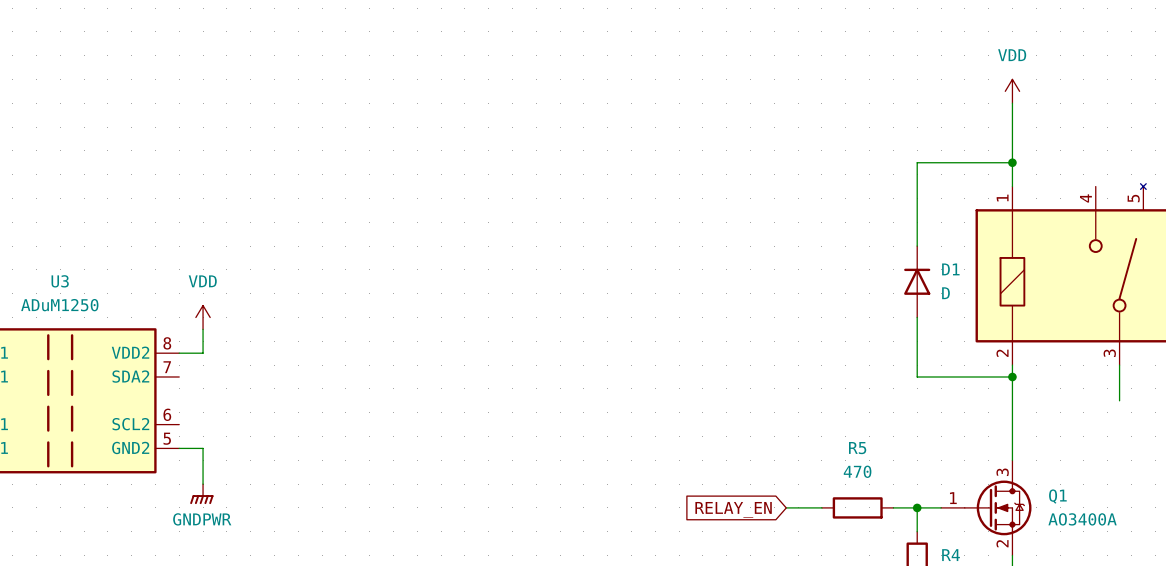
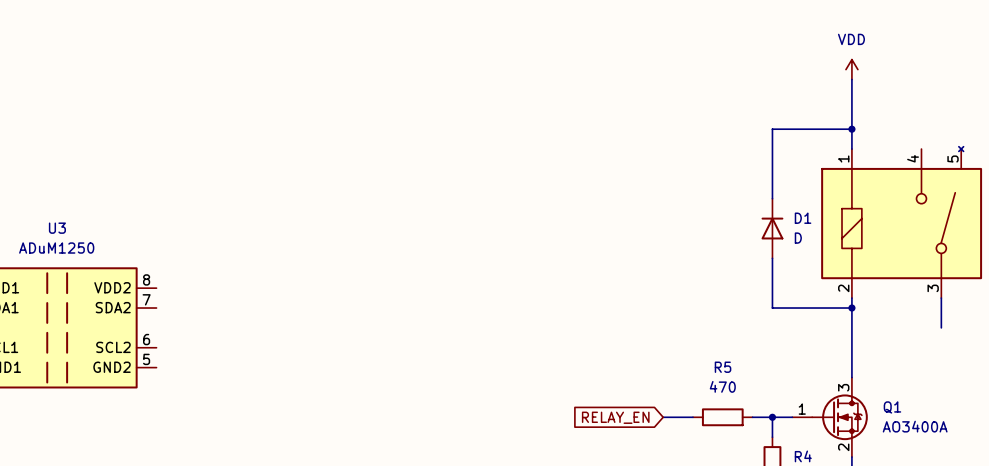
power symbol: VDD (203, 317) -> none
wire: (203, 329) (203, 353) (179, 353) -> none
wire: (179, 448) (203, 448) (203, 484) -> none
power symbol: GNDPWR (201, 494) -> none

